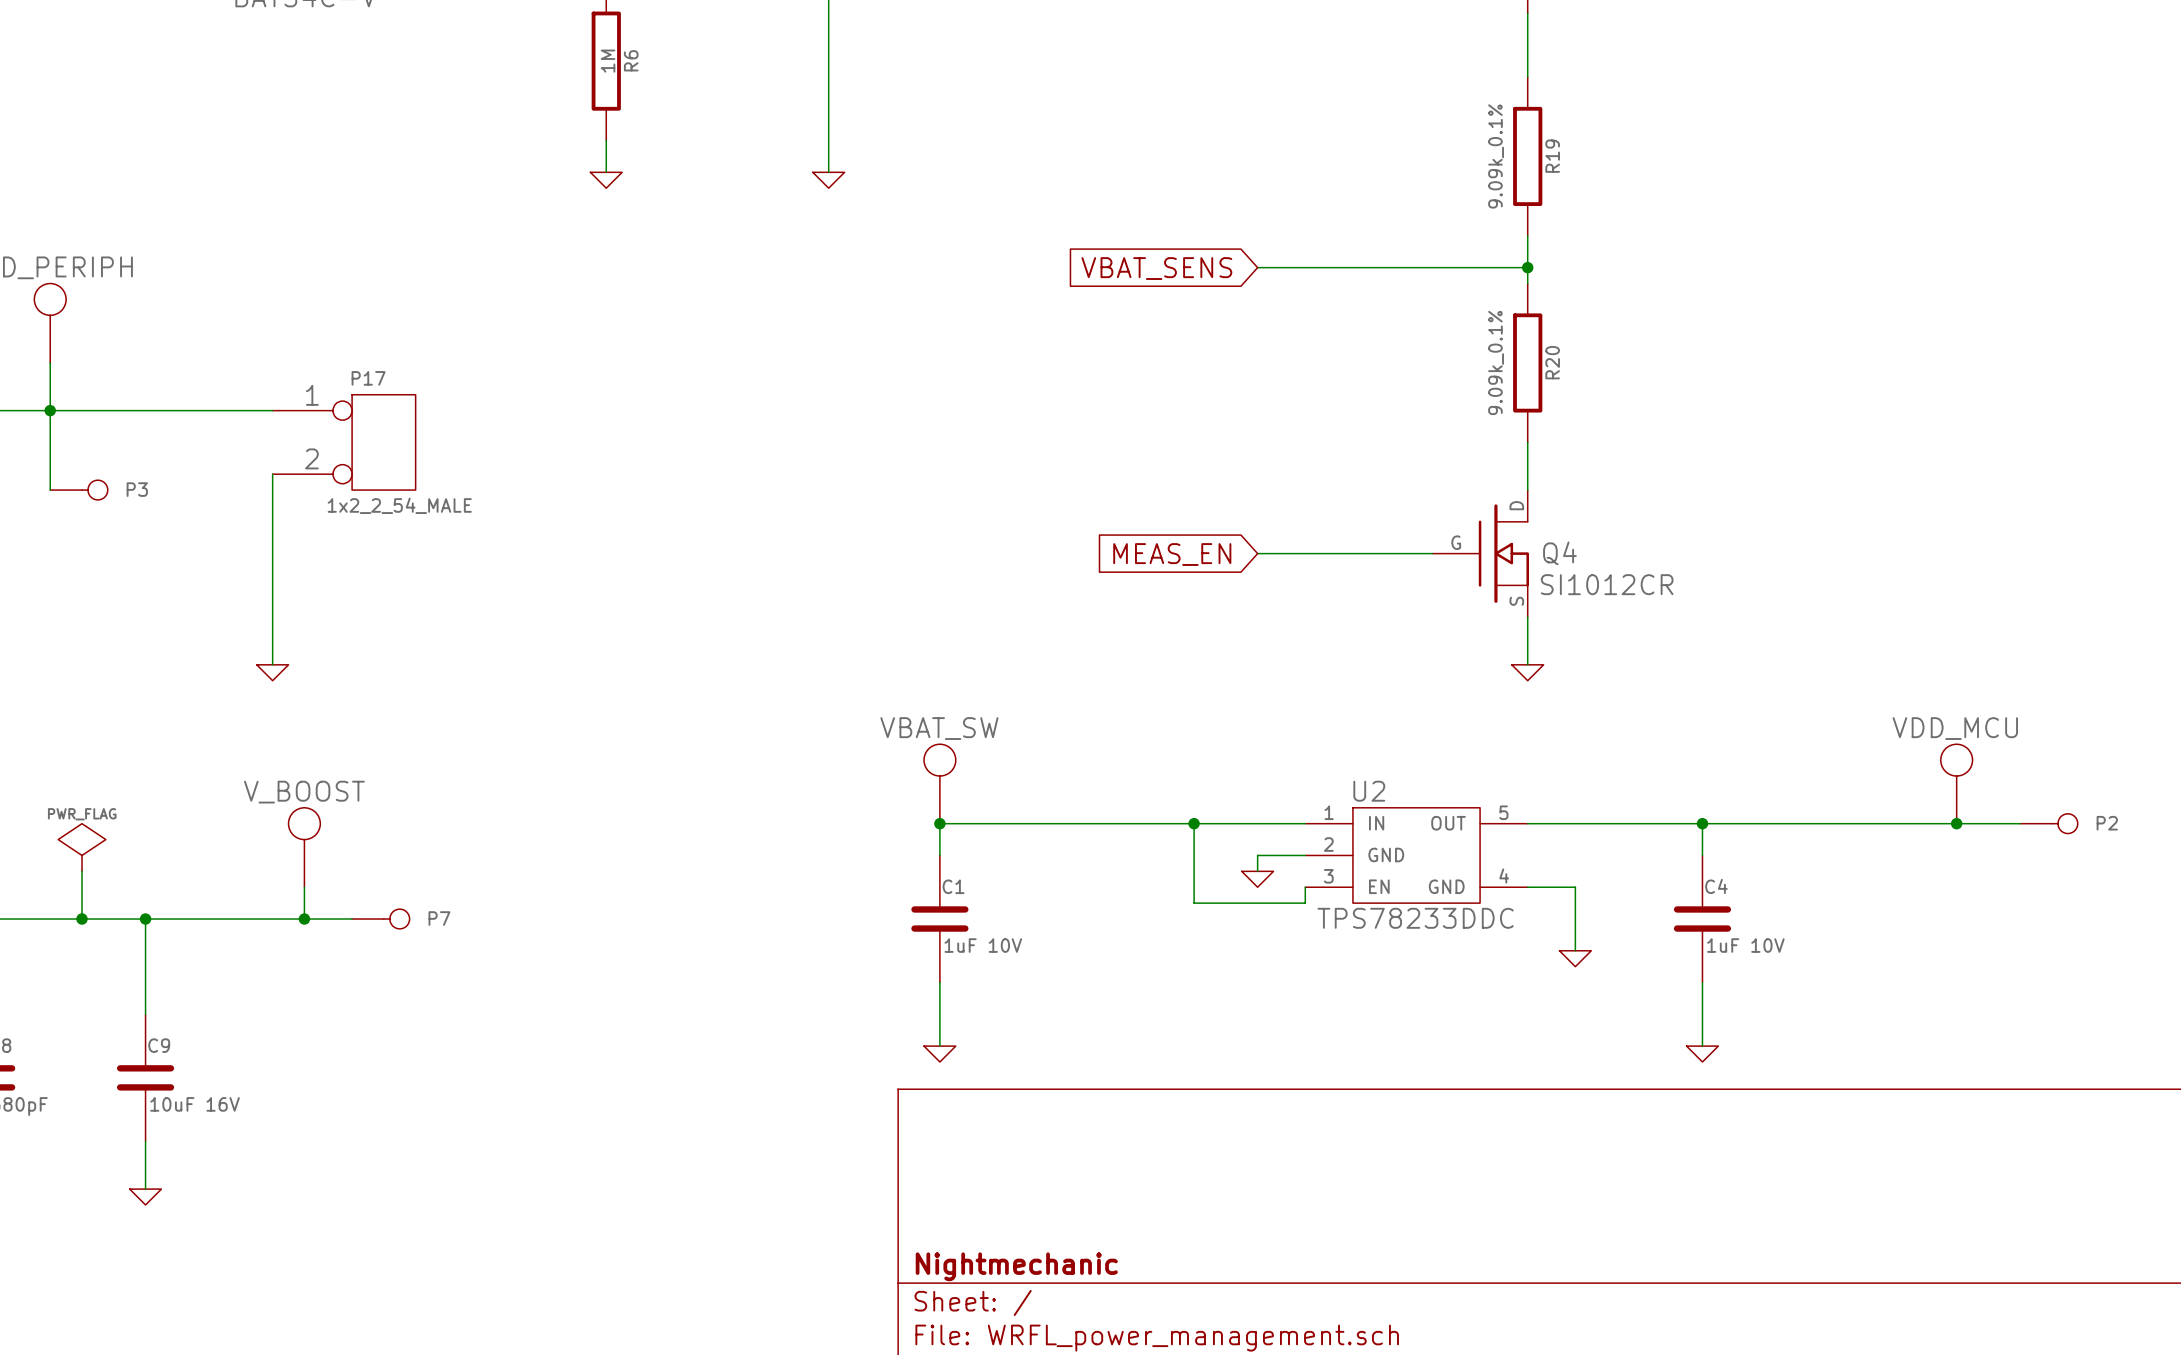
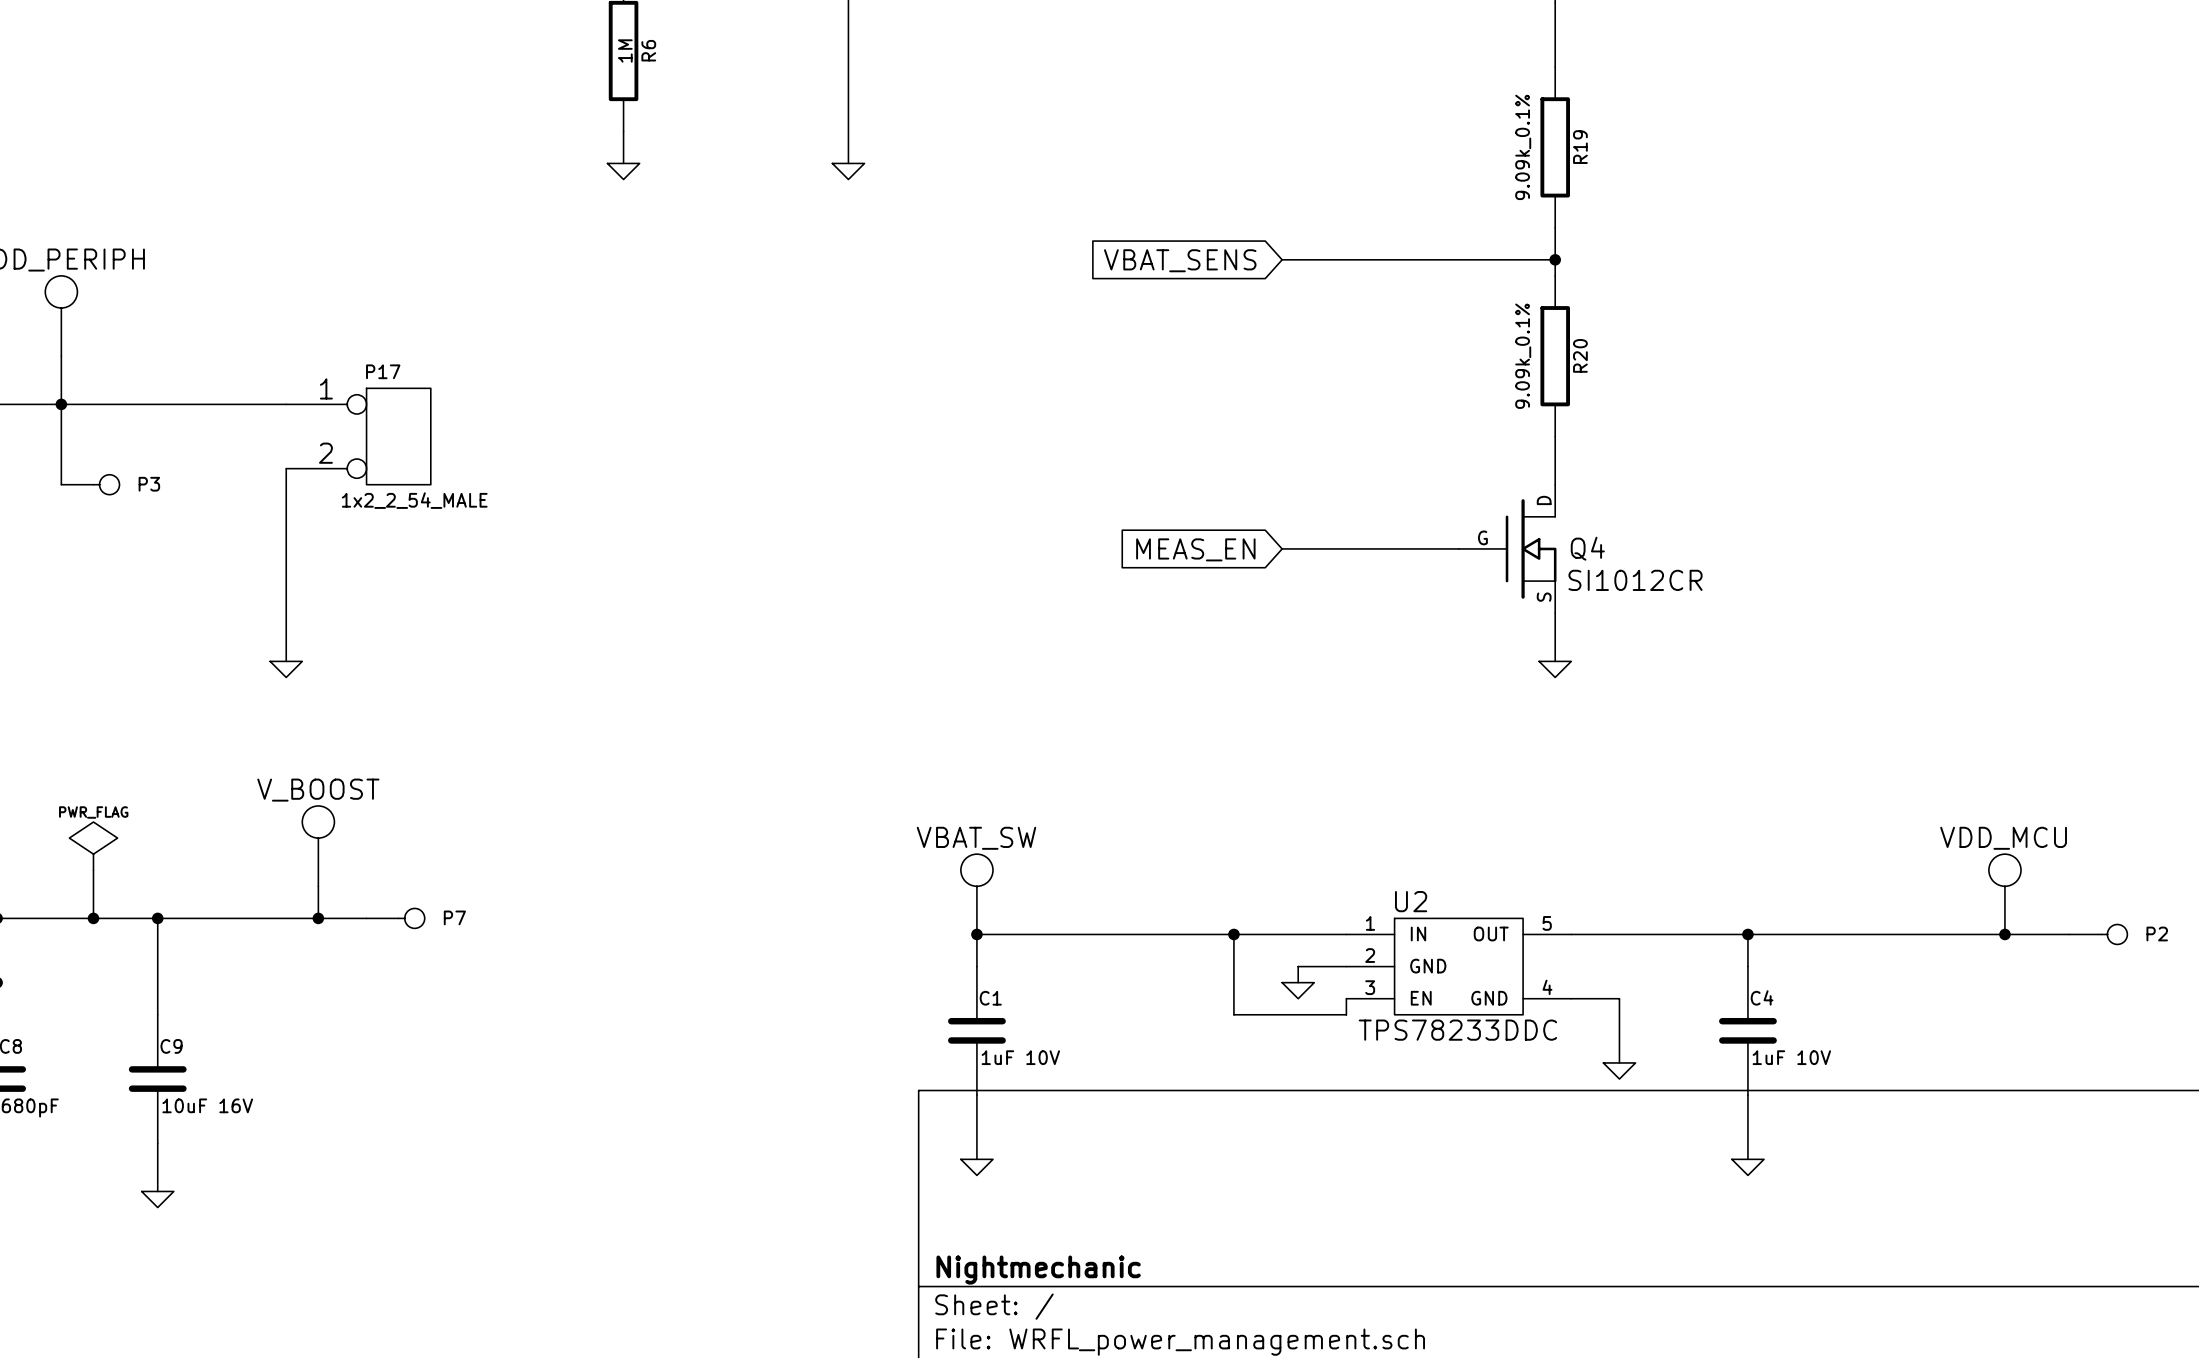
power symbol position: VBAT_SW (939, 783) -> VBAT_SW (976, 894)
power symbol position: VDD_MCU (1956, 783) -> VDD_MCU (2004, 894)
junction: (939, 823) -> none
wire: (1194, 823) (1194, 903) (1305, 903) (1305, 887) -> (1233, 934) (1233, 1014) (1346, 1014) (1346, 998)
junction: (1194, 823) -> none
wire: (1305, 823) (939, 823) (939, 855) -> (1346, 934) (976, 934) (976, 966)
wire: (1527, 823) (2020, 823) -> (1571, 934) (2069, 934)
wire: (1702, 823) (1702, 855) -> (1747, 934) (1747, 966)
junction: (1702, 823) -> none
junction: (1956, 823) -> none
P2 position: (2048, 823) -> (2098, 934)
wire: (1305, 855) (1257, 855) (1257, 871) -> (1346, 966) (1298, 966) (1298, 982)
U2 position: (1416, 855) -> (1458, 966)
power symbol position: (1257, 879) -> (1298, 990)
wire: (1527, 887) (1575, 887) (1575, 950) -> (1571, 998) (1619, 998) (1619, 1062)
C1 position: (939, 919) -> (976, 1030)
C4 position: (1702, 919) -> (1747, 1030)
junction: none -> (976, 934)
junction: none -> (1233, 934)
junction: none -> (1747, 934)
junction: none -> (2004, 934)
power symbol: (1575, 958) -> none
wire: (939, 982) (939, 1046) -> (976, 1095) (976, 1159)
wire: (1702, 982) (1702, 1046) -> (1747, 1095) (1747, 1159)
power symbol position: (939, 1054) -> (976, 1167)
power symbol: (1702, 1054) -> none
power symbol: none -> (1619, 1071)
power symbol: none -> (1747, 1167)

